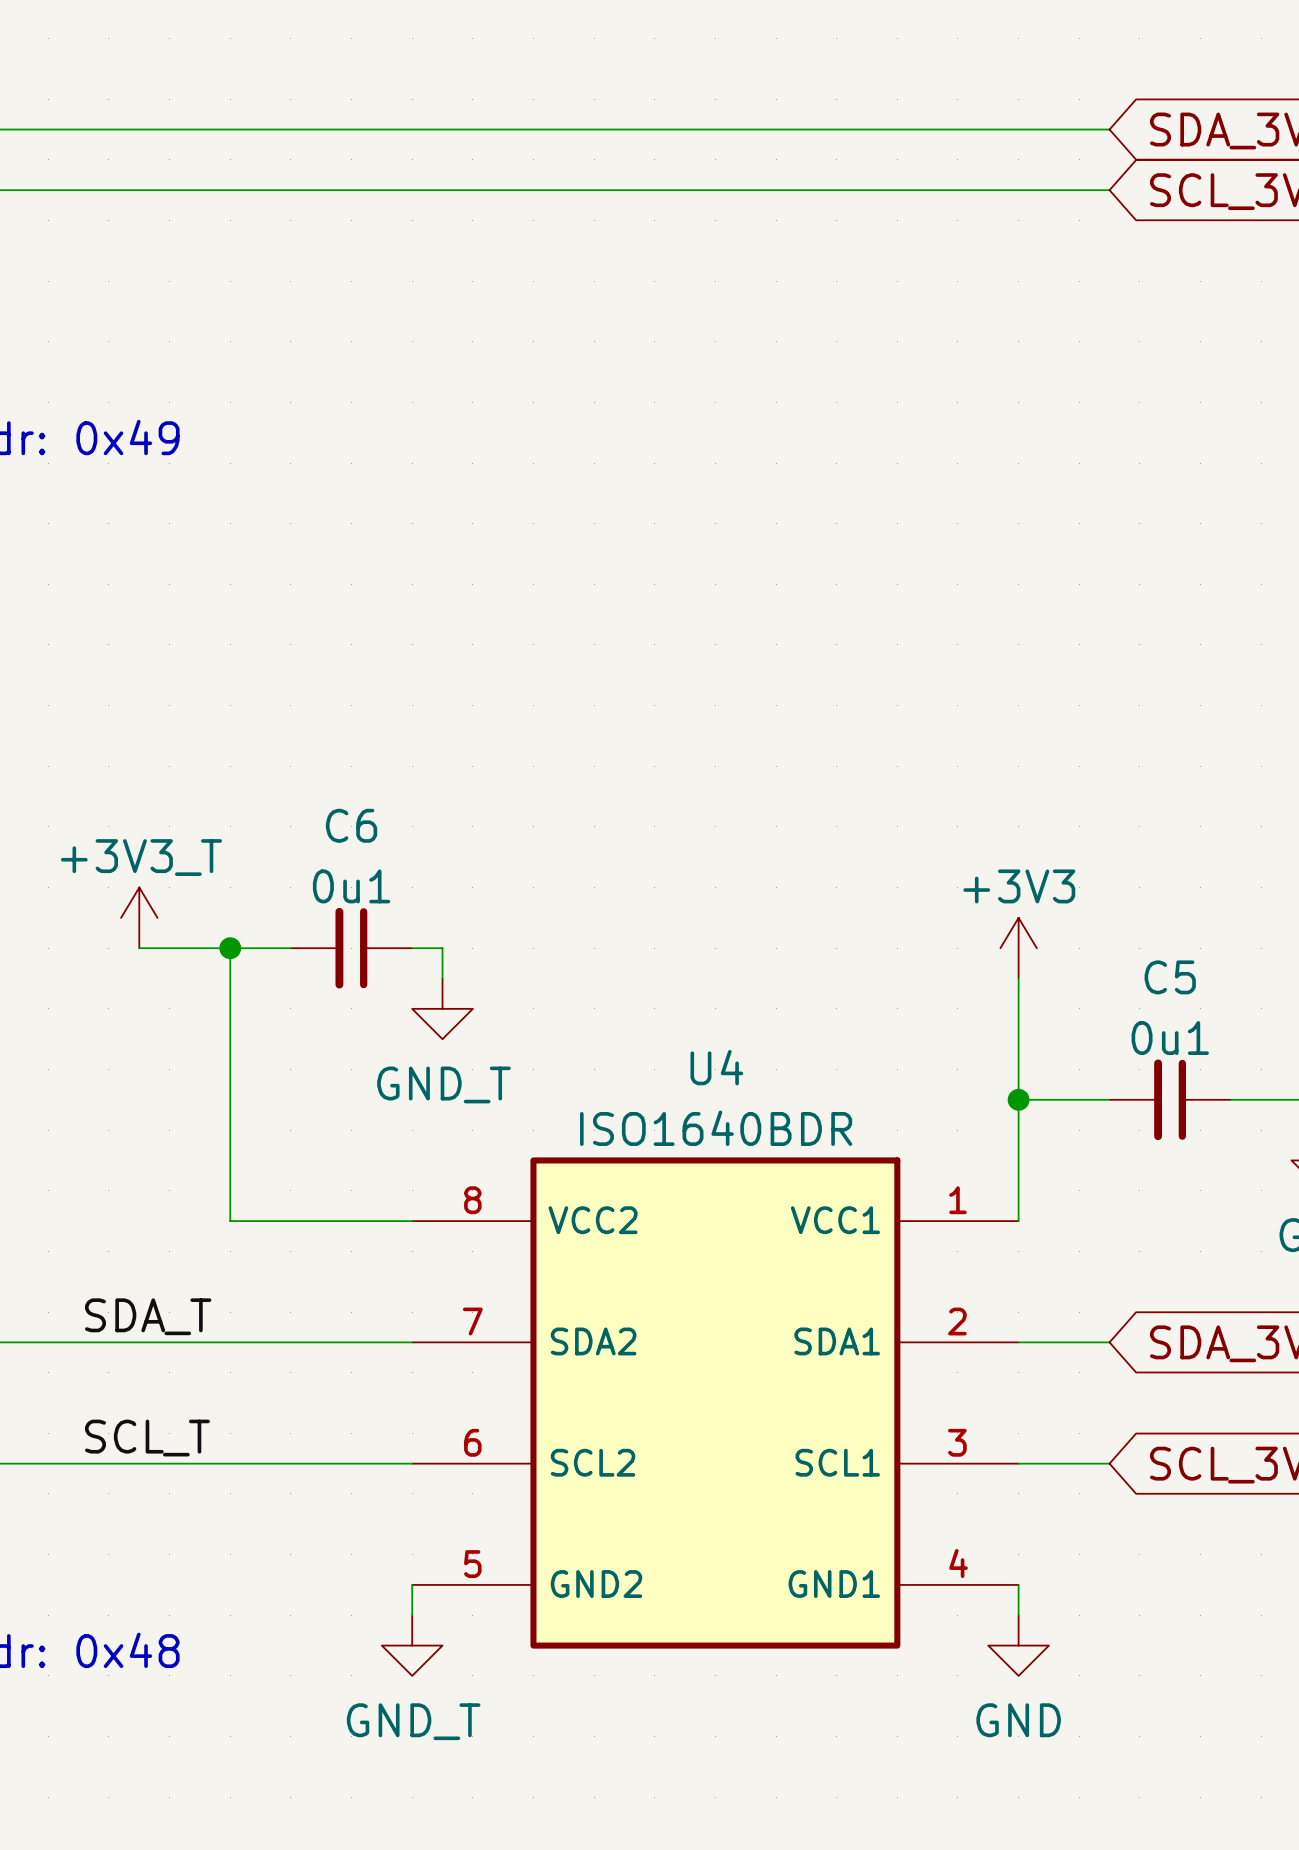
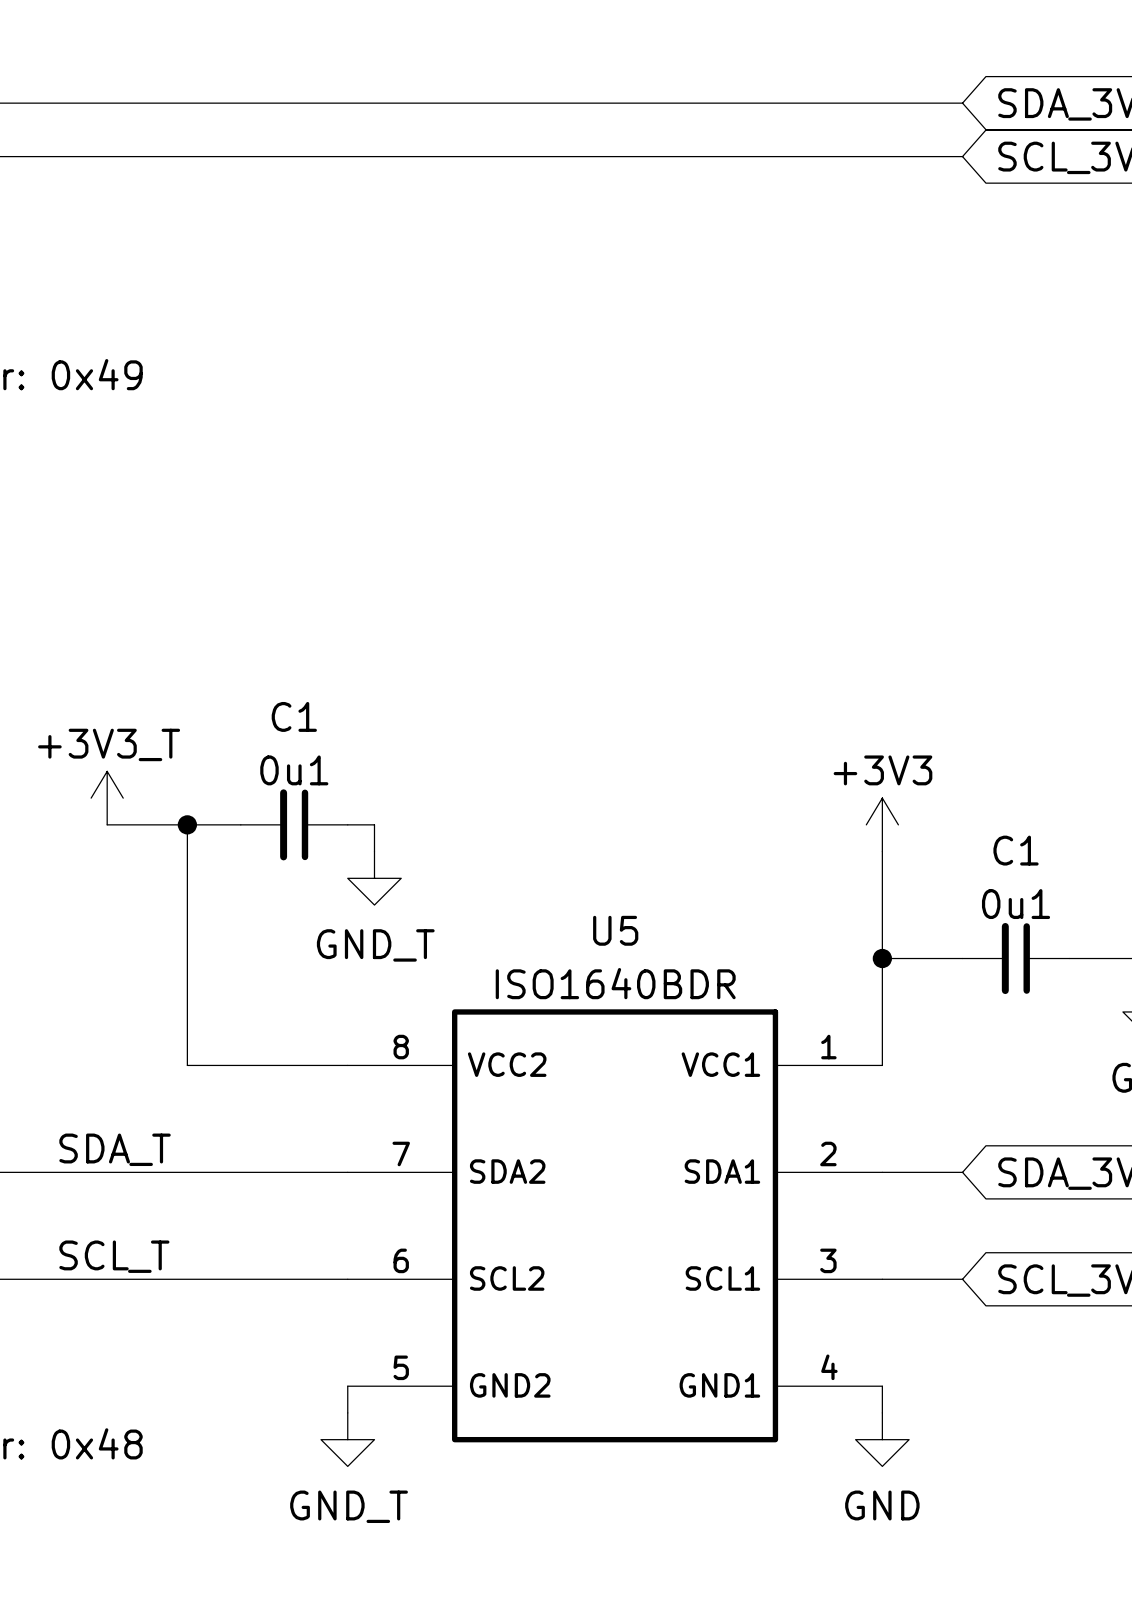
C6 name: C6 (351, 825) -> C1 (294, 716)
C5 name: C5 (1170, 977) -> C1 (1016, 850)
U4 name: U4 (716, 1067) -> U5 (615, 930)

